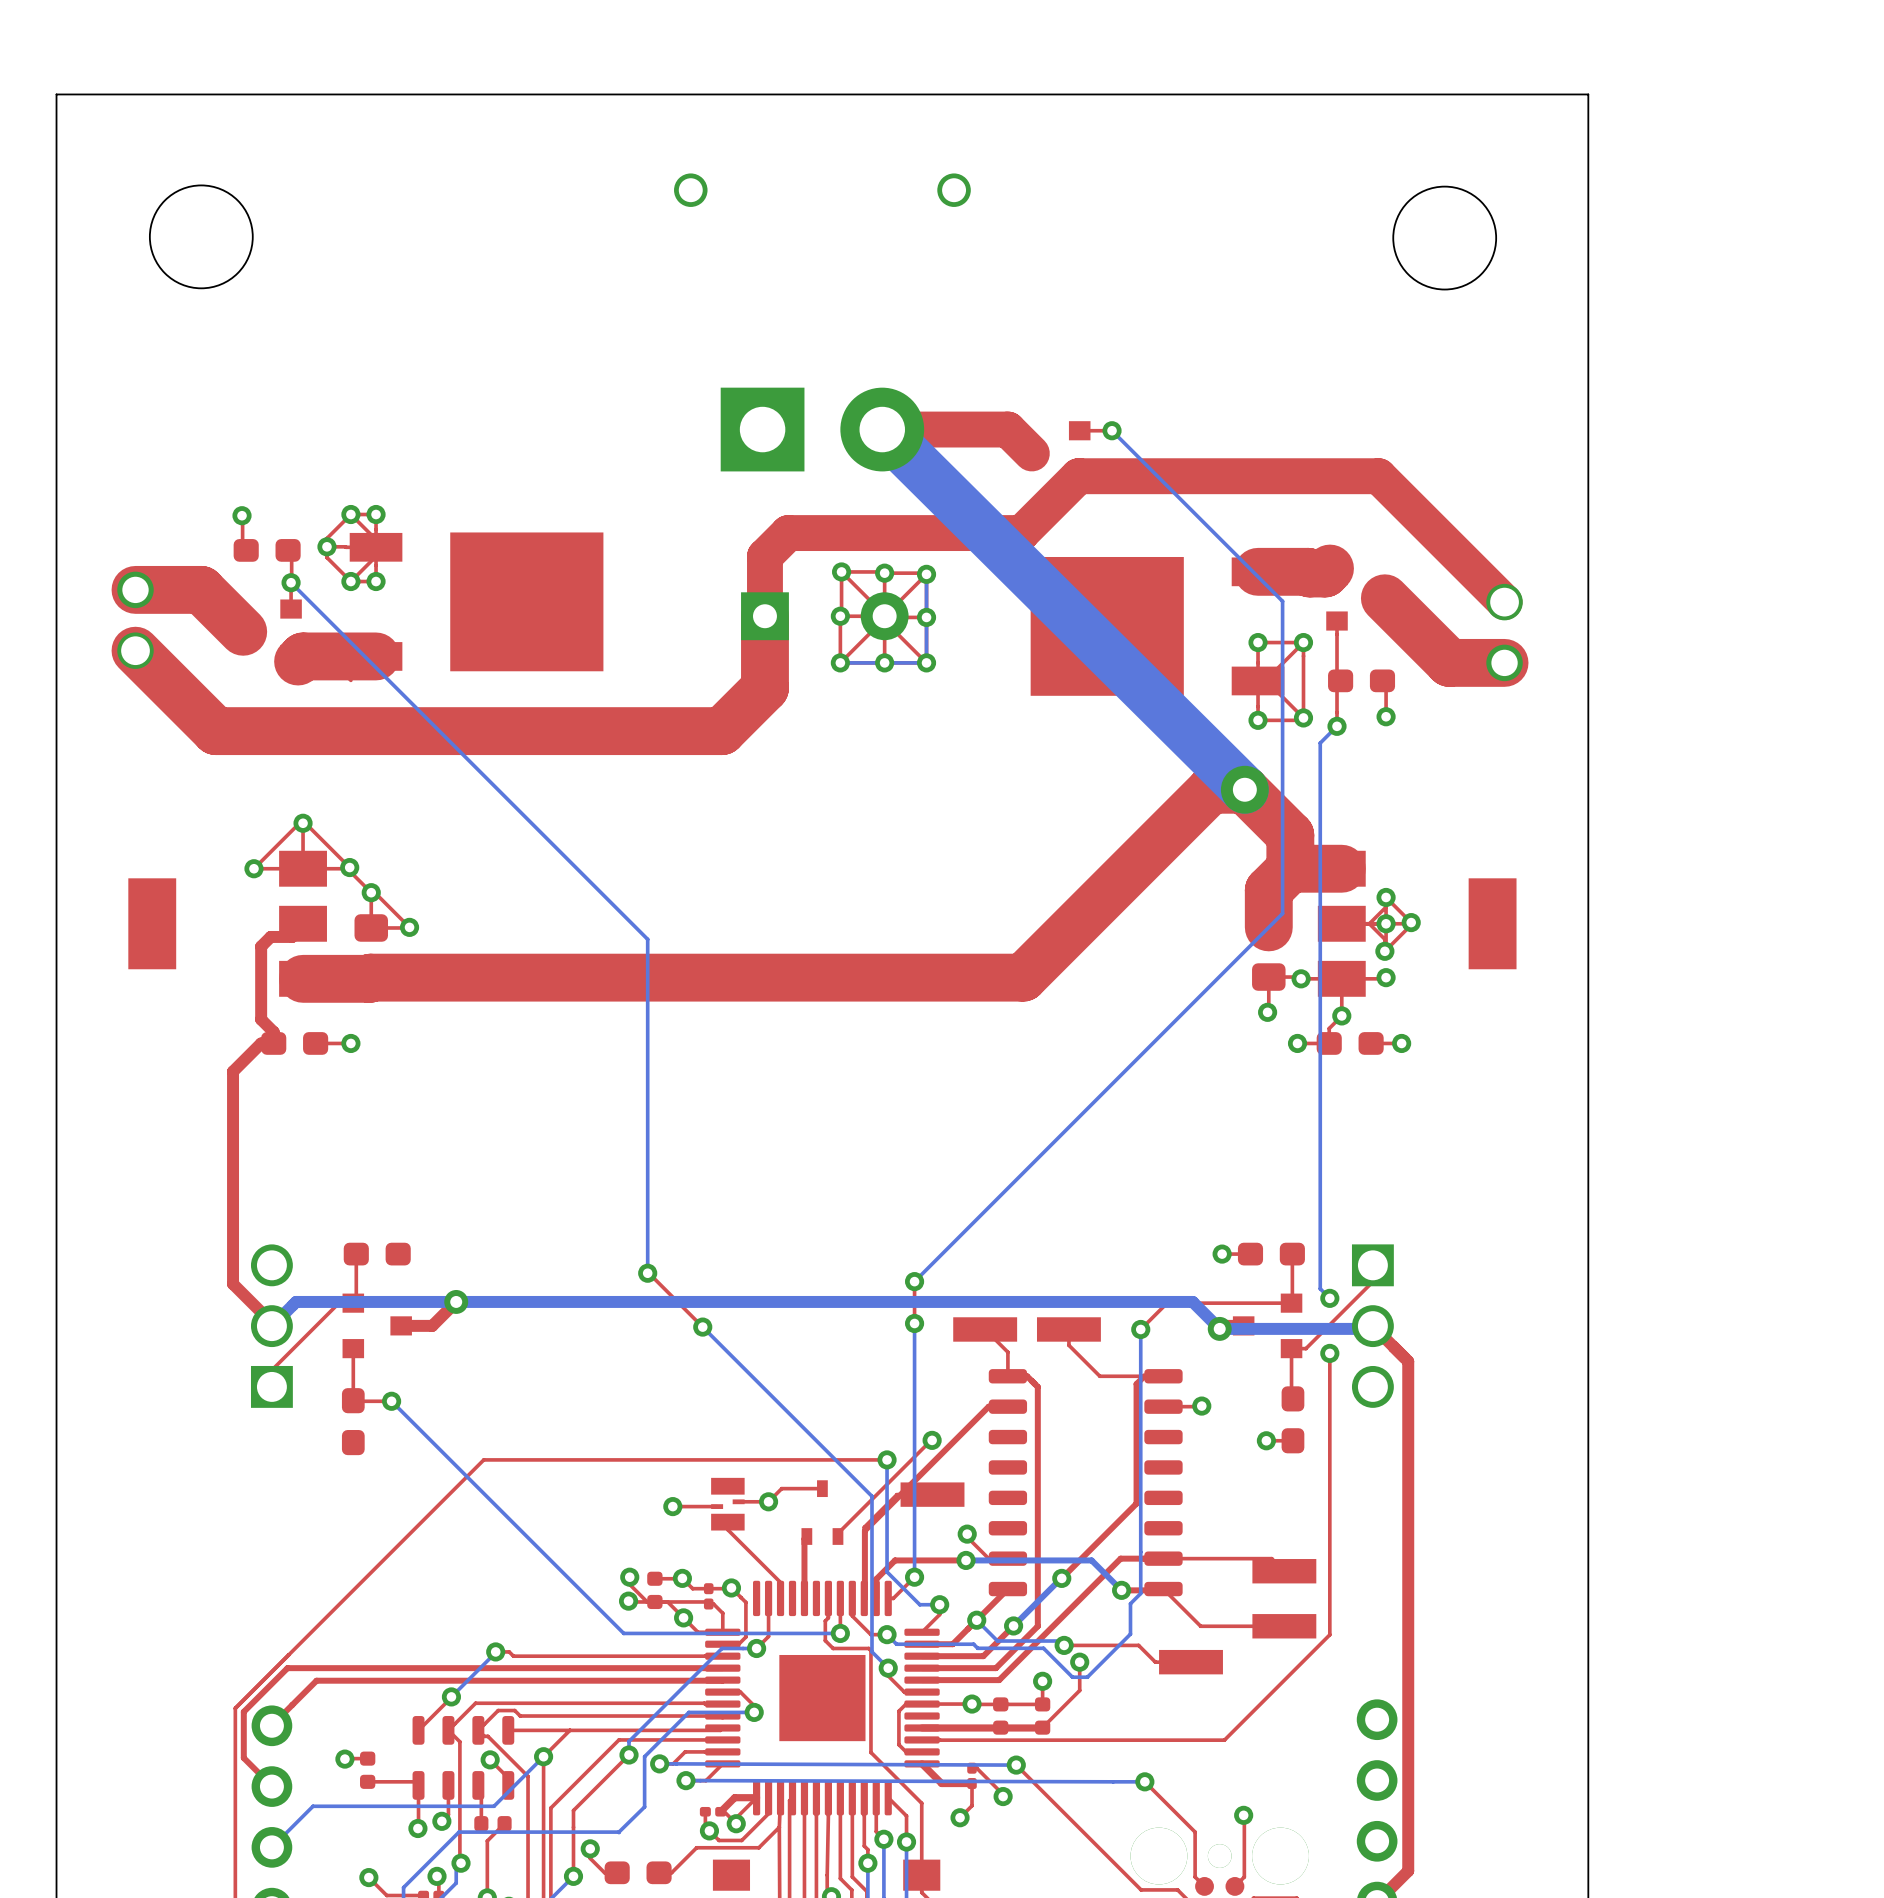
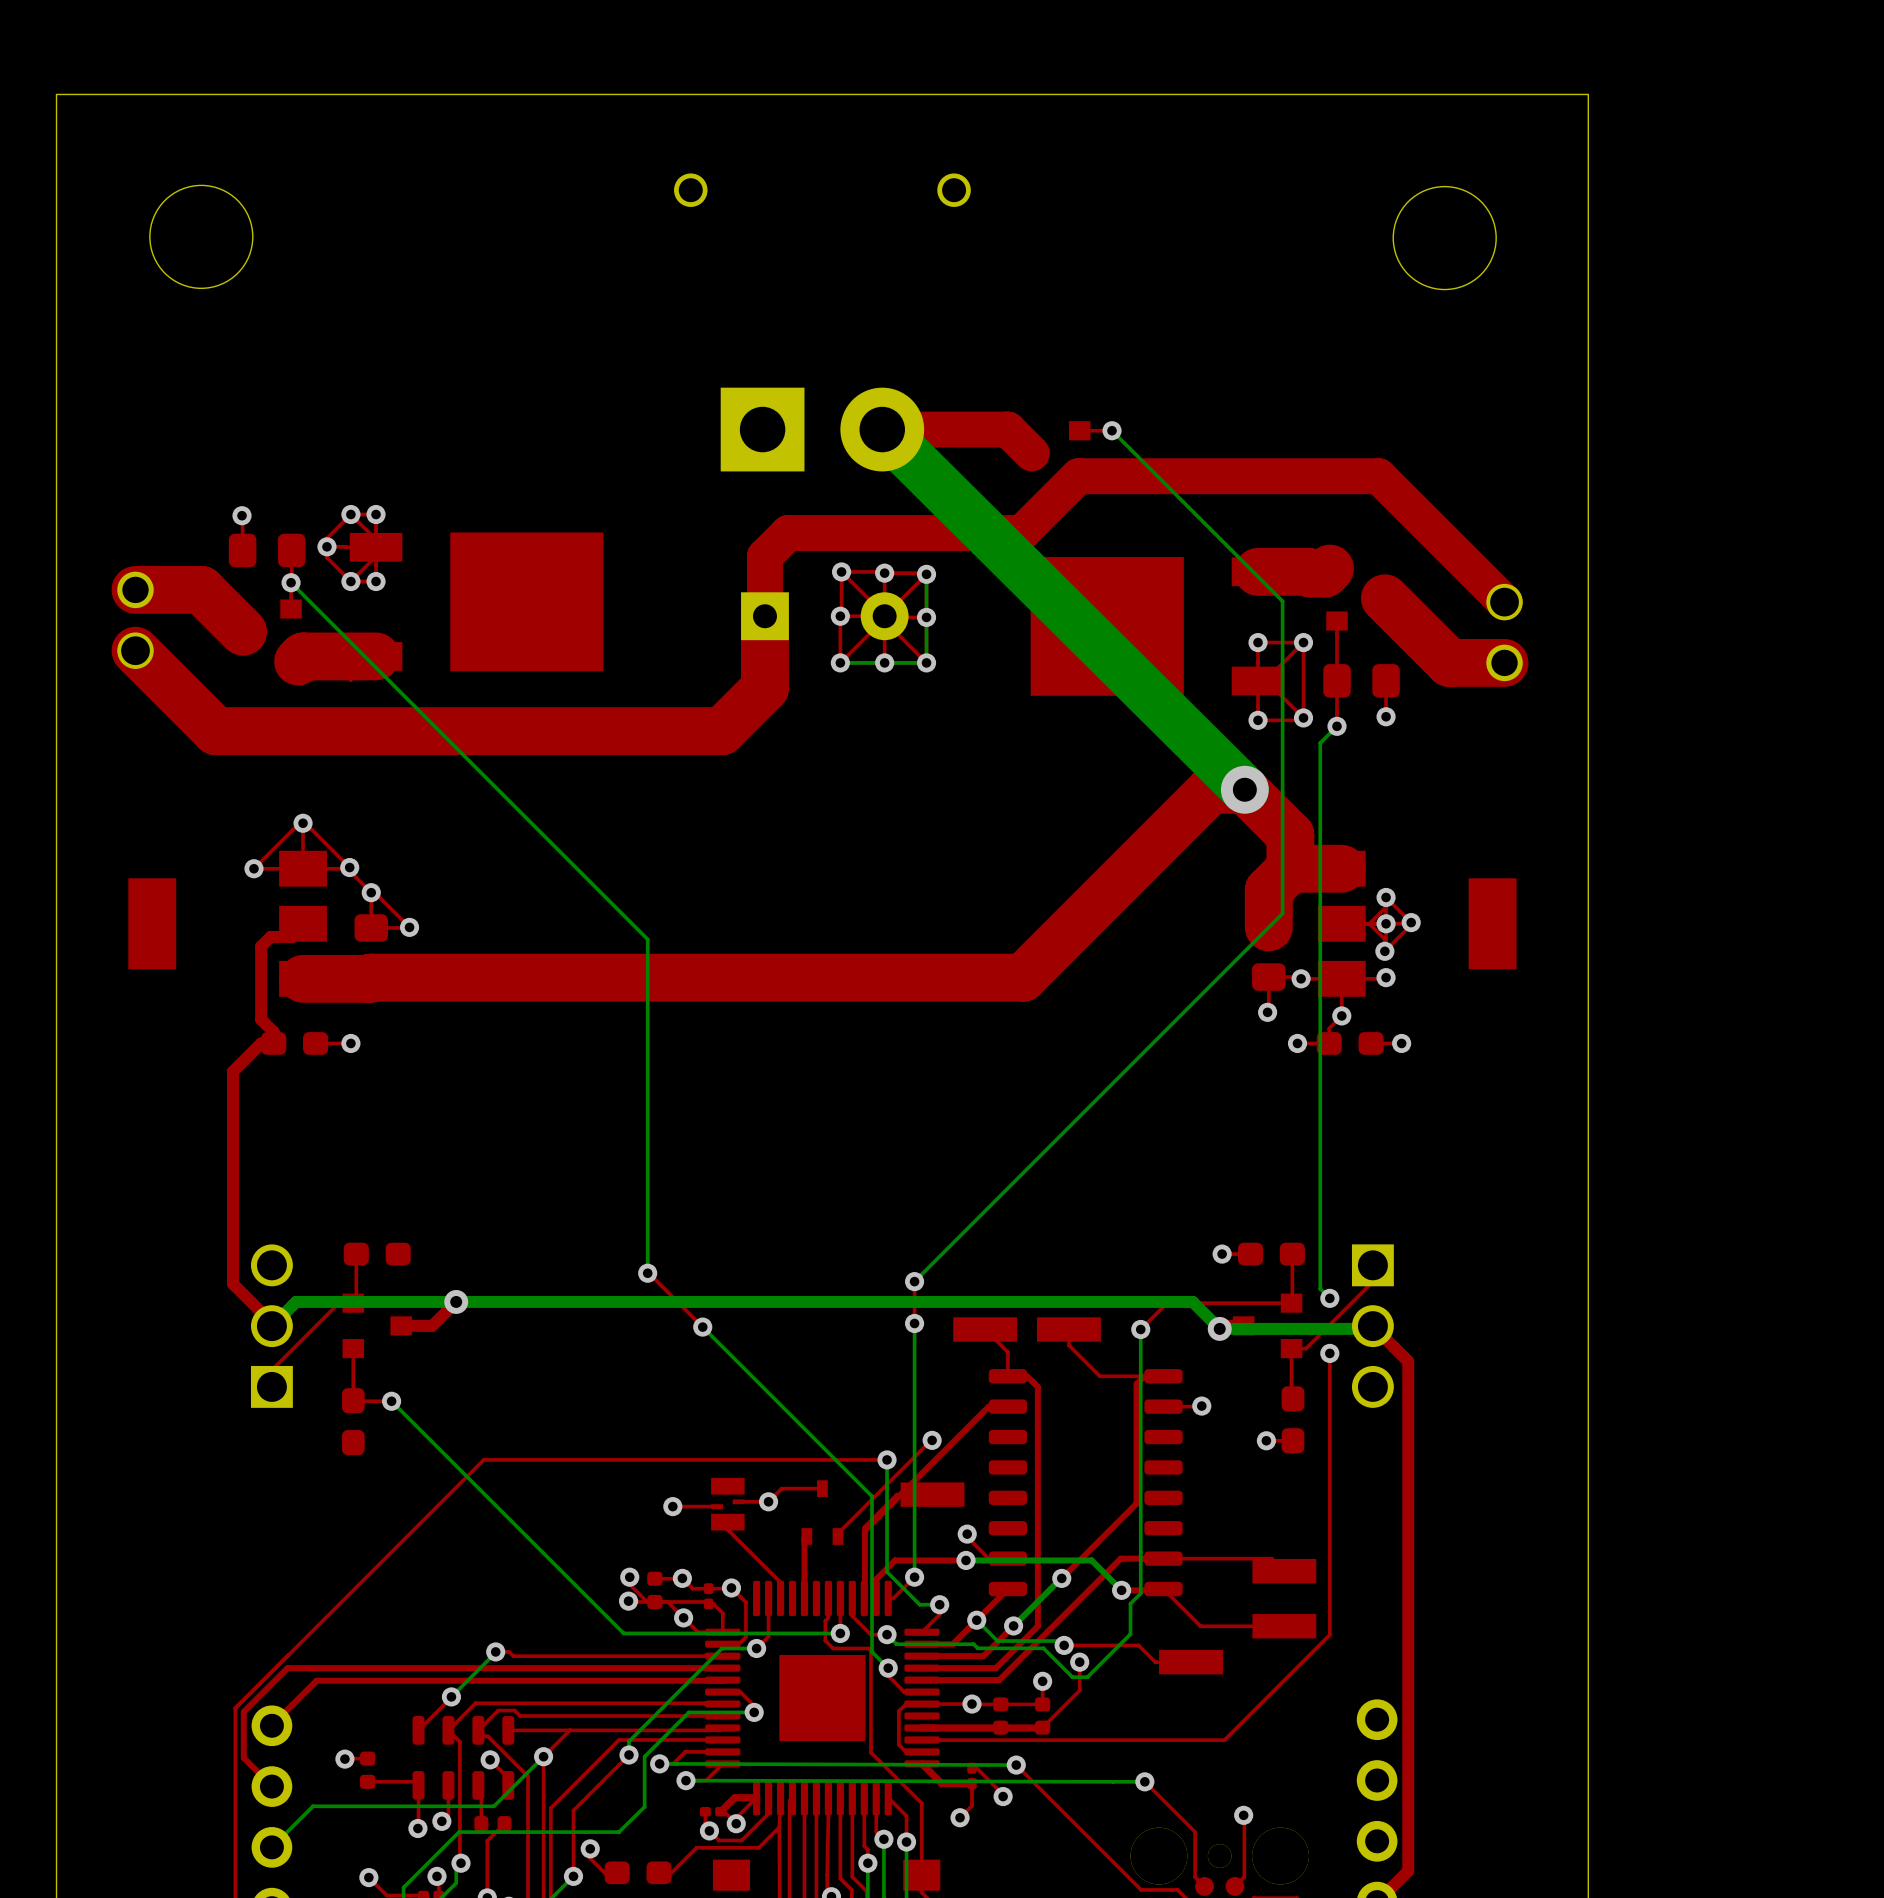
part footprint: [233, 539, 301, 562] -> [228, 533, 306, 568]
part footprint: [1328, 669, 1396, 693] -> [1323, 664, 1400, 698]

